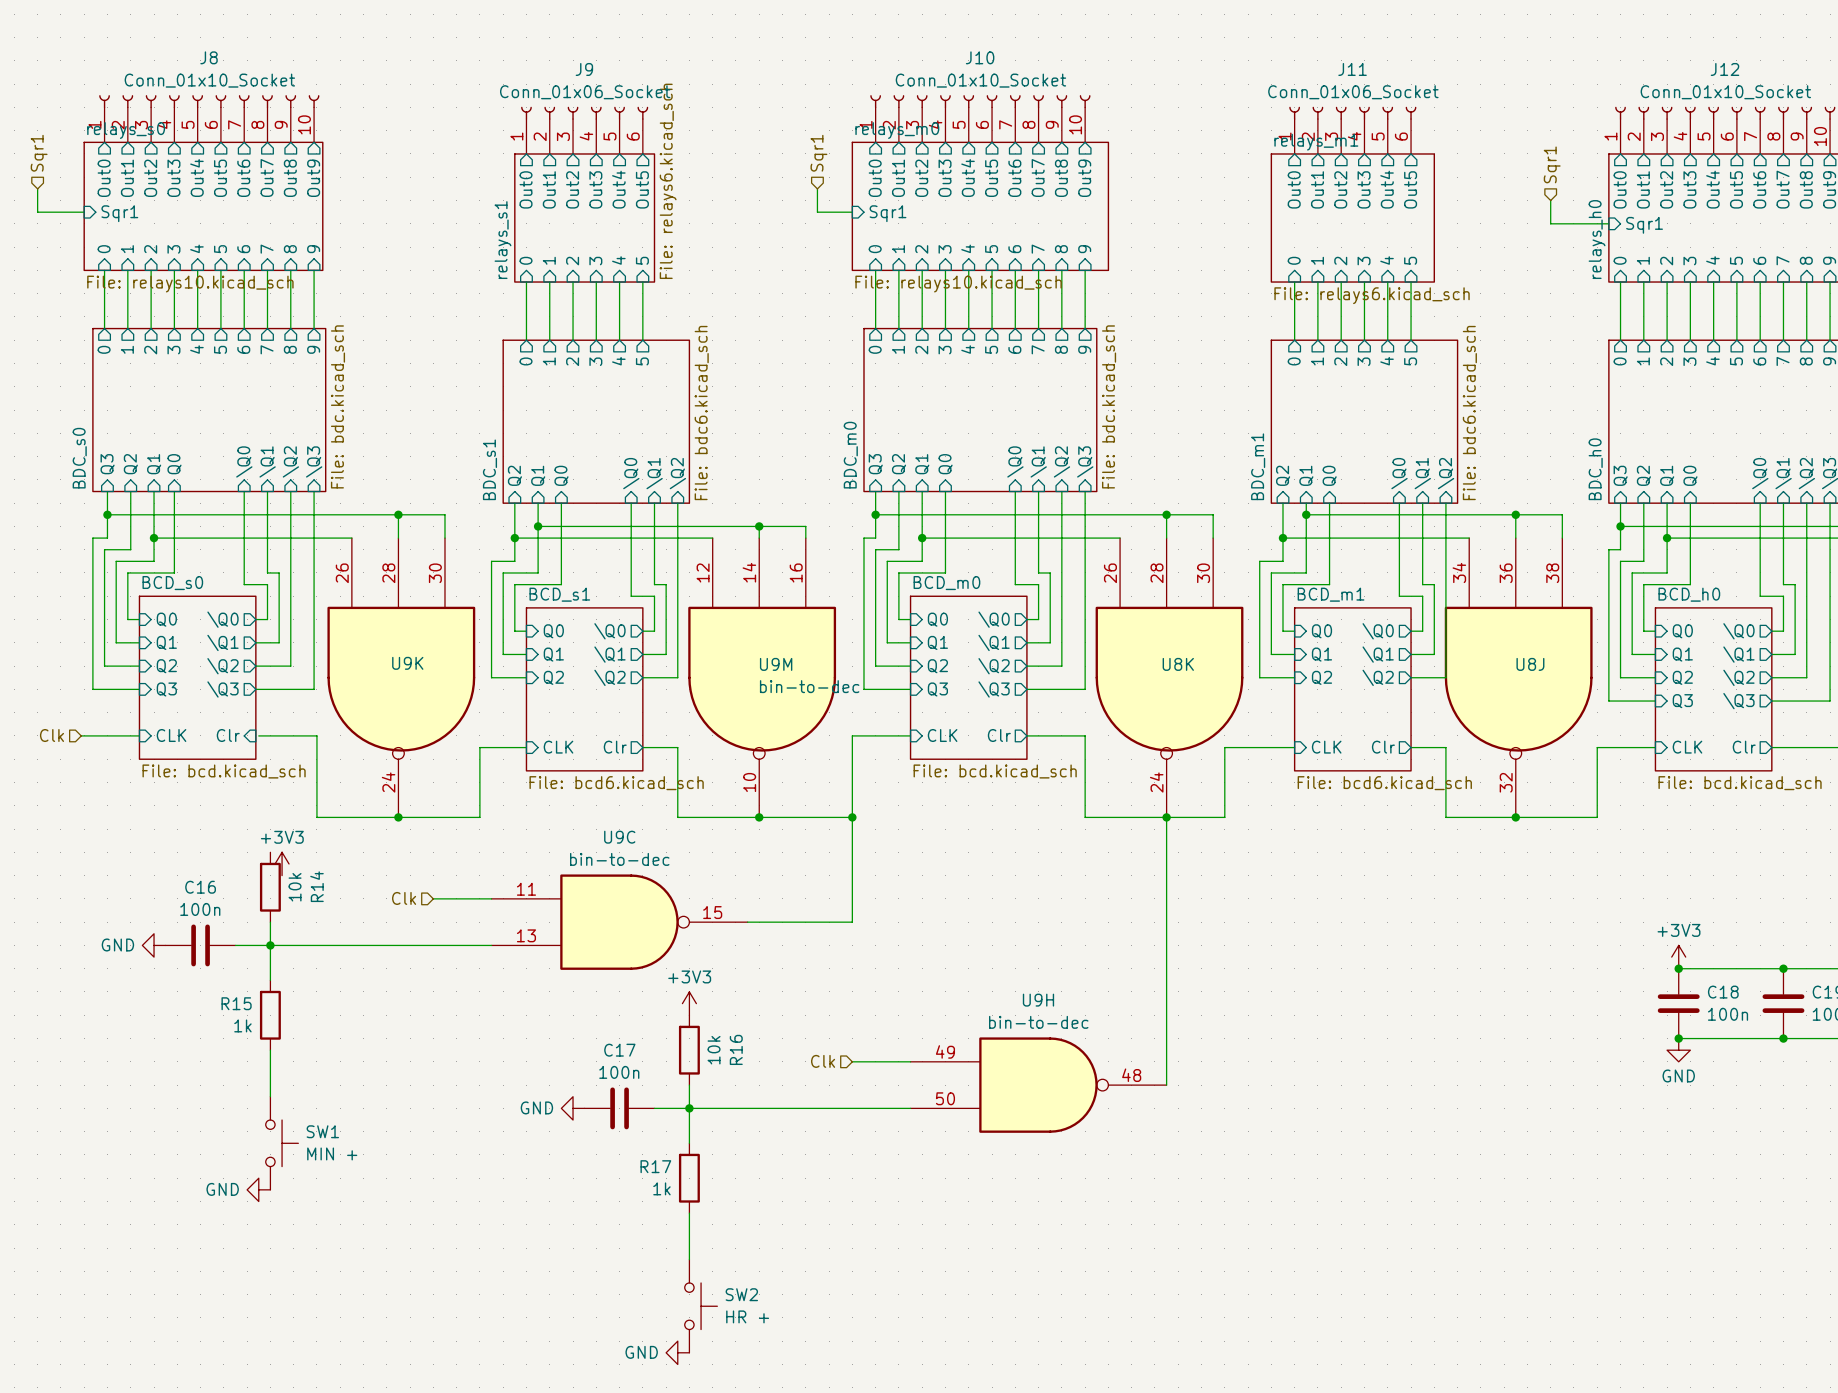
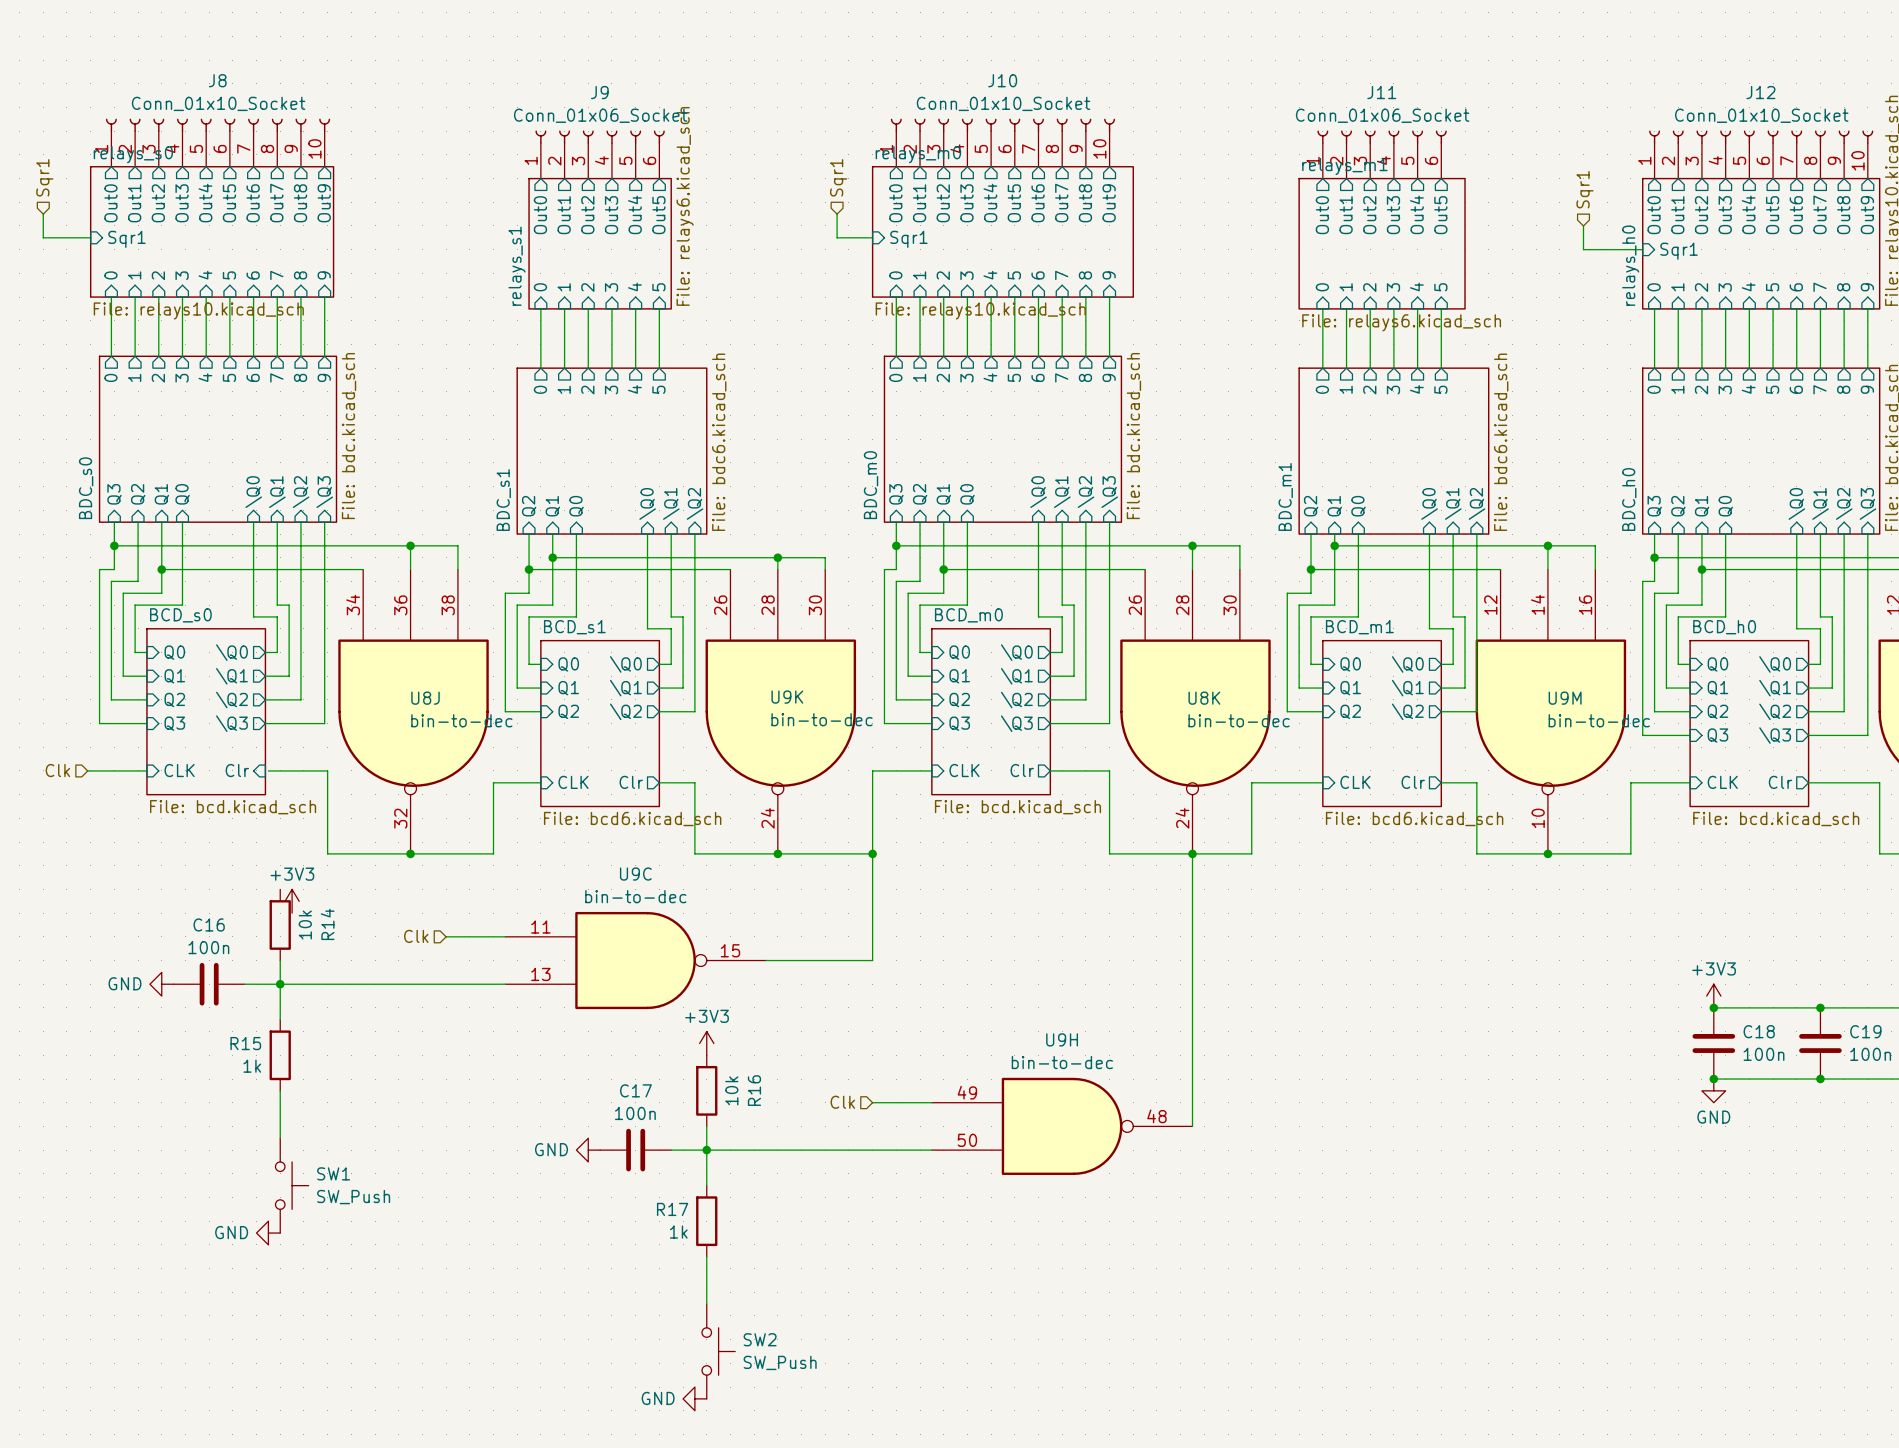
U9K position: (401, 677) -> (780, 711)
U9M position: (762, 677) -> (1550, 711)
U8J position: (1518, 677) -> (413, 711)
U9K value: none -> bin-to-dec (822, 719)
U8J value: none -> bin-to-dec (461, 720)
U8K value: none -> bin-to-dec (1239, 720)
SW1 value: MIN + (332, 1153) -> SW_Push (353, 1197)
SW2 value: HR + (747, 1316) -> SW_Push (780, 1362)

